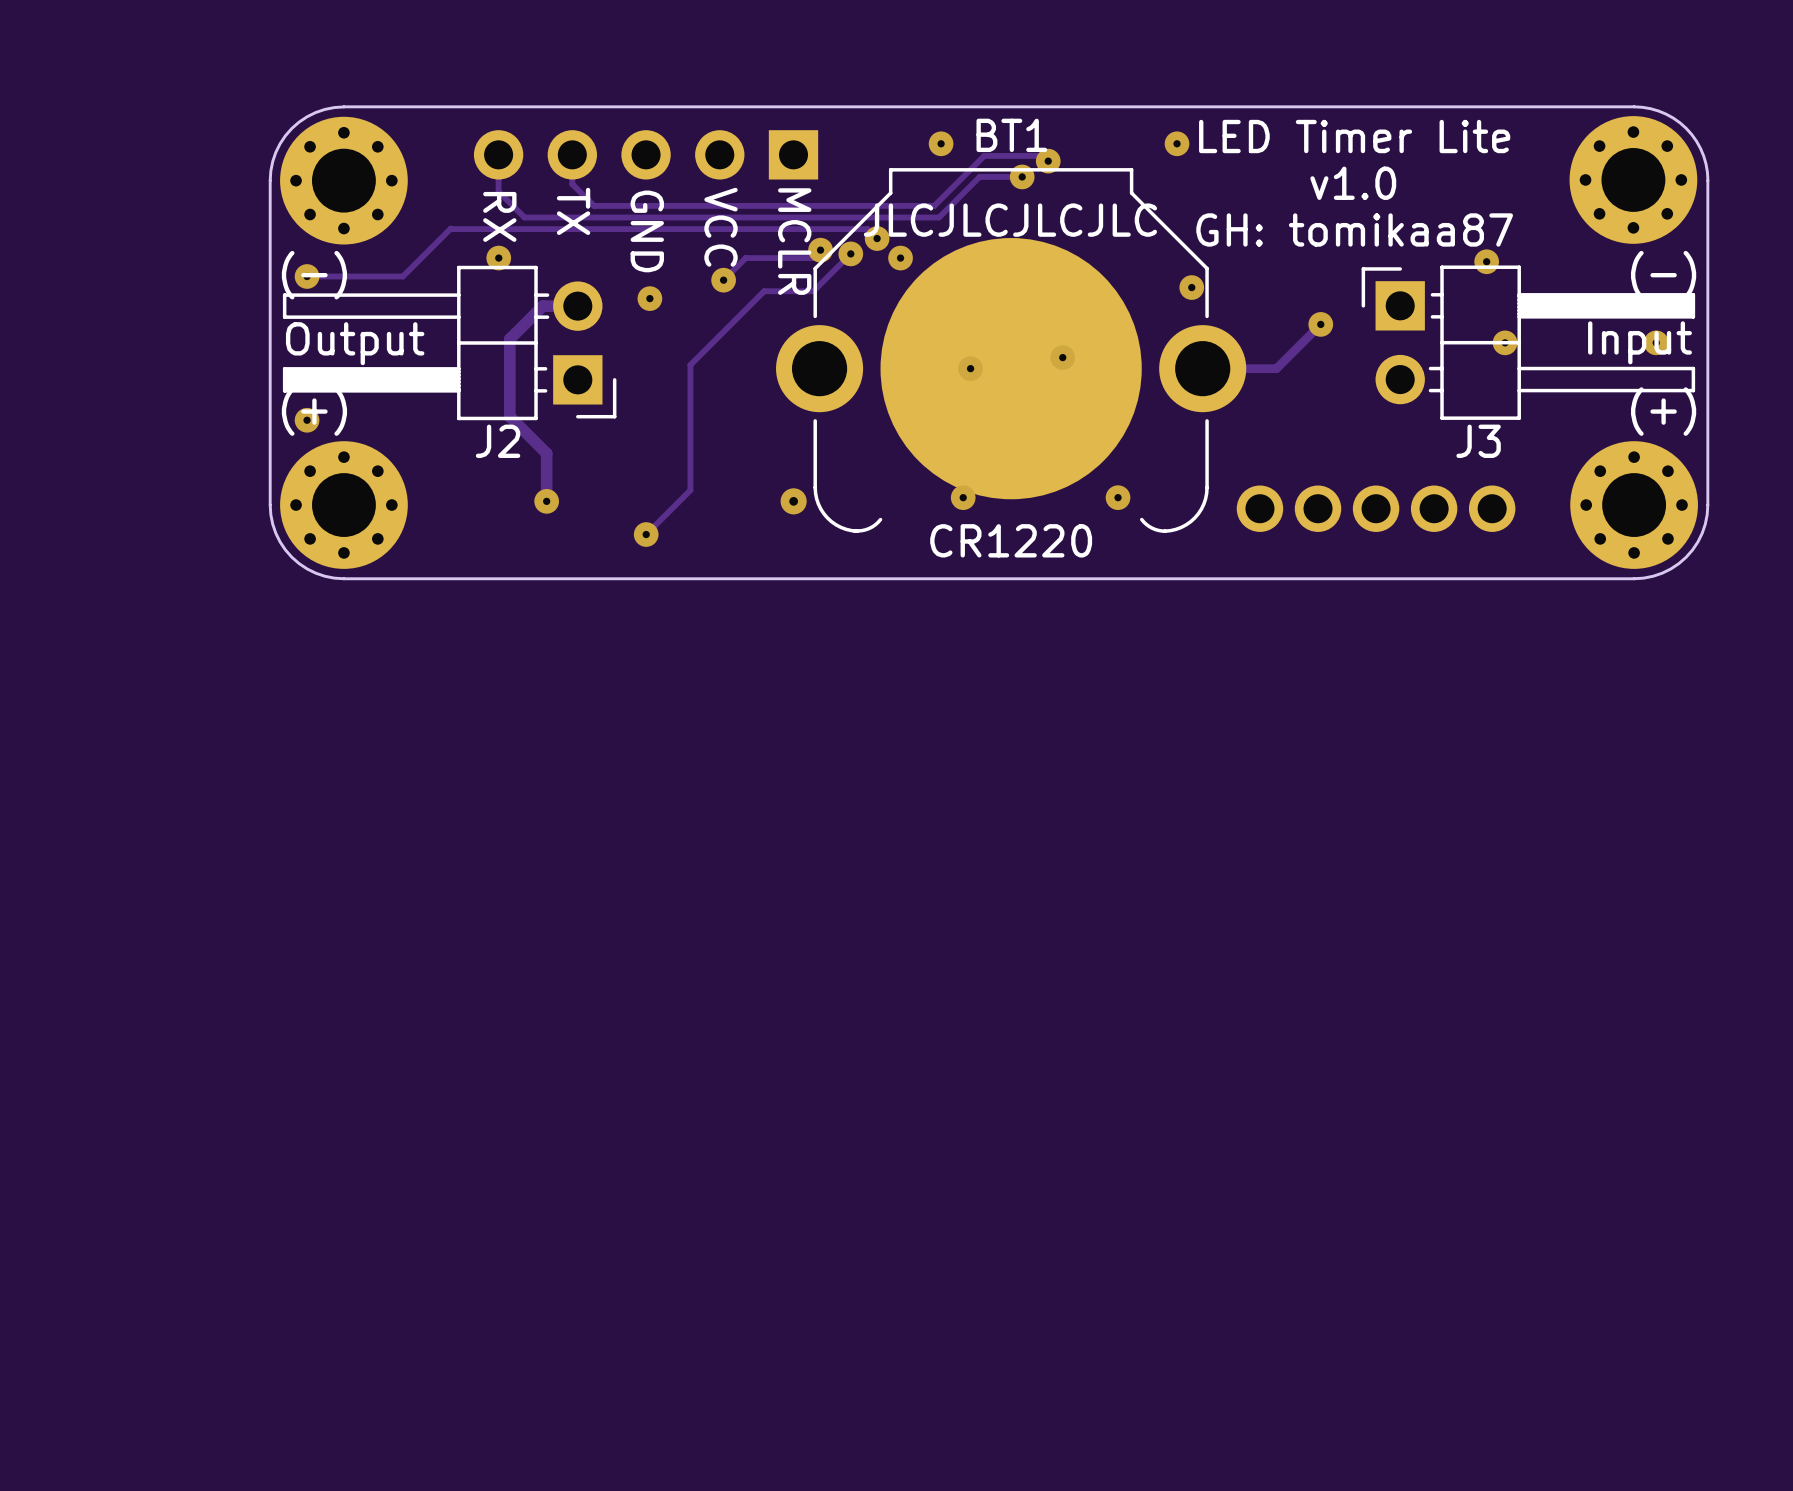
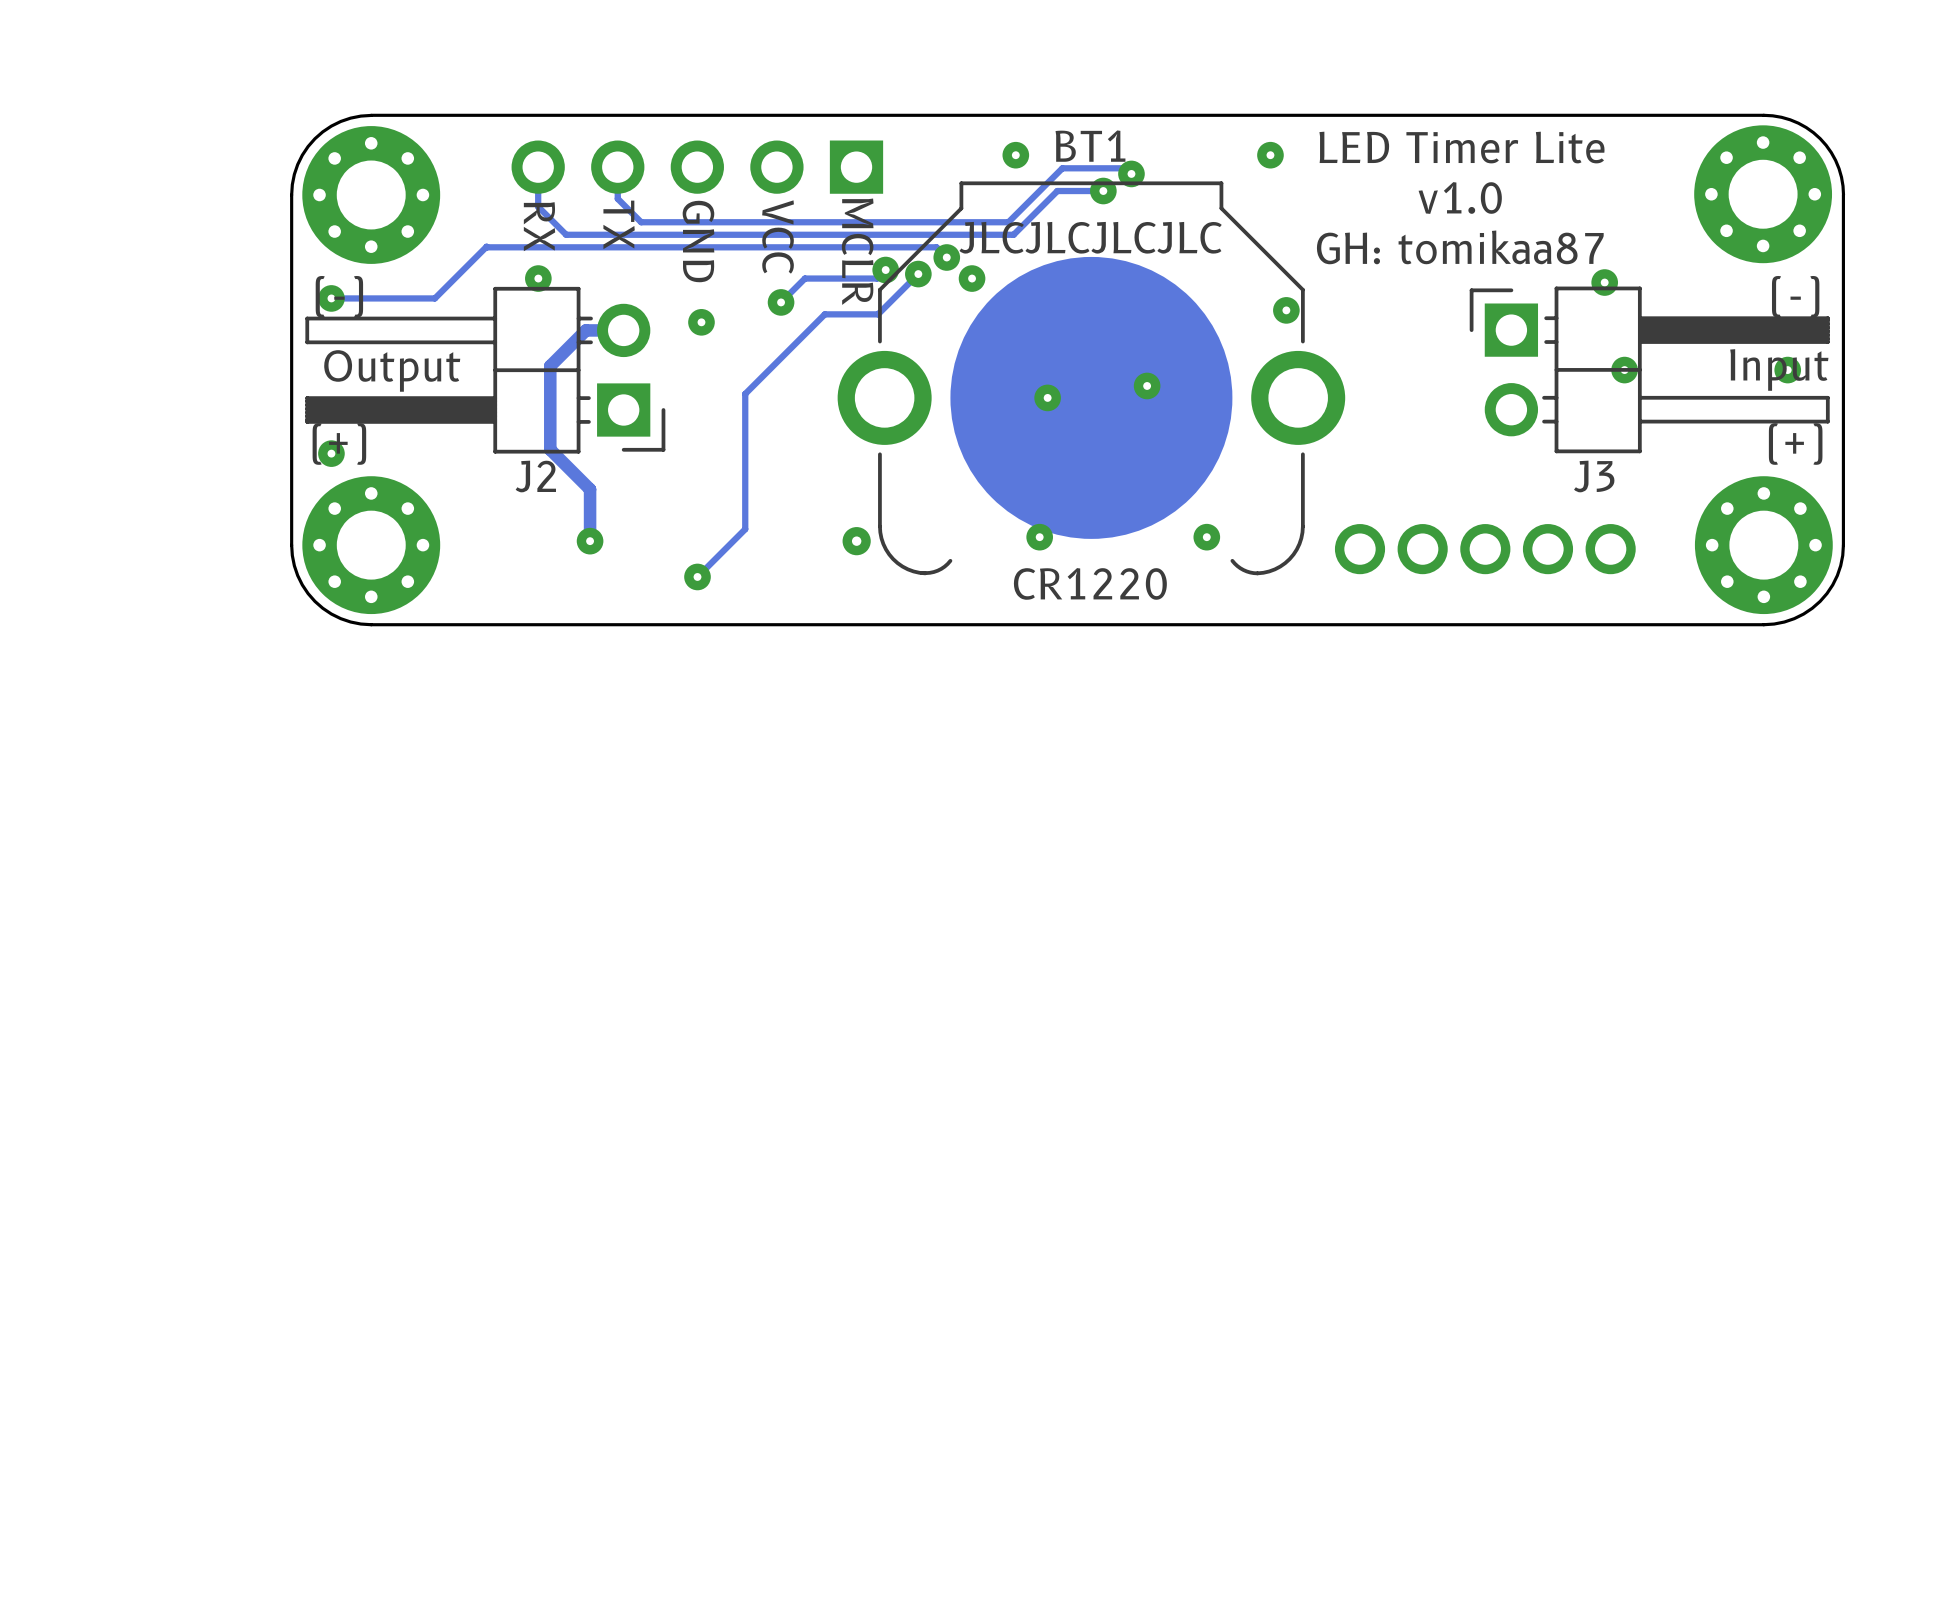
track: (1320, 324) (1276, 368) (1202, 368) -> none
via: (1320, 324) -> none

